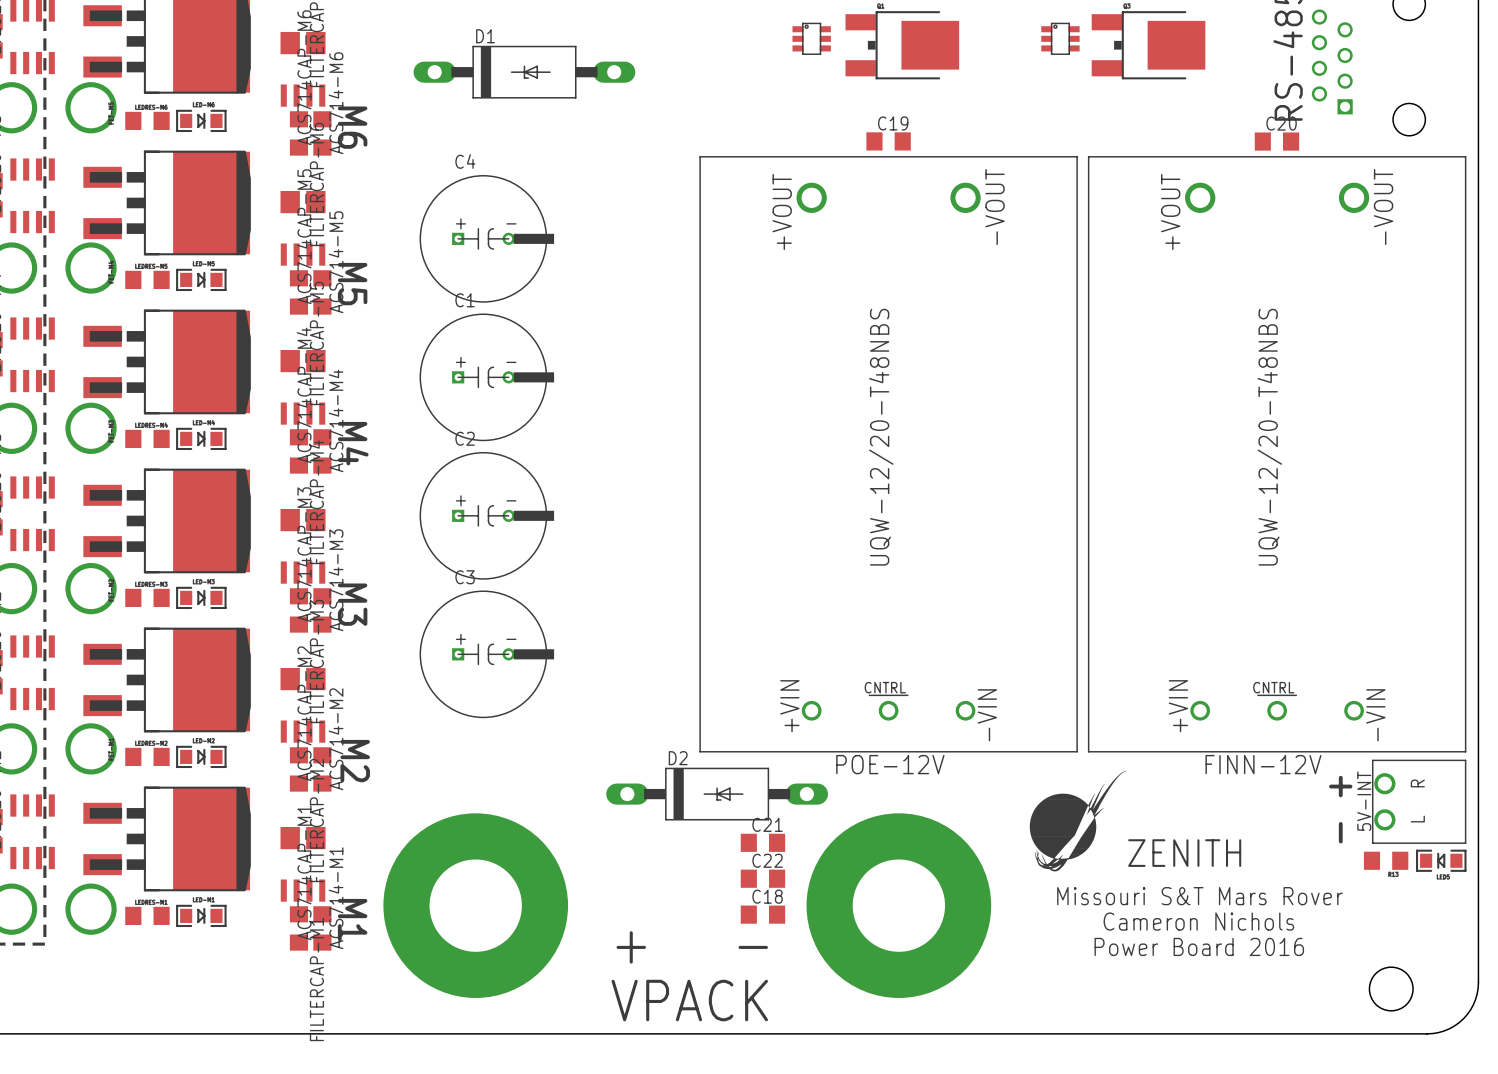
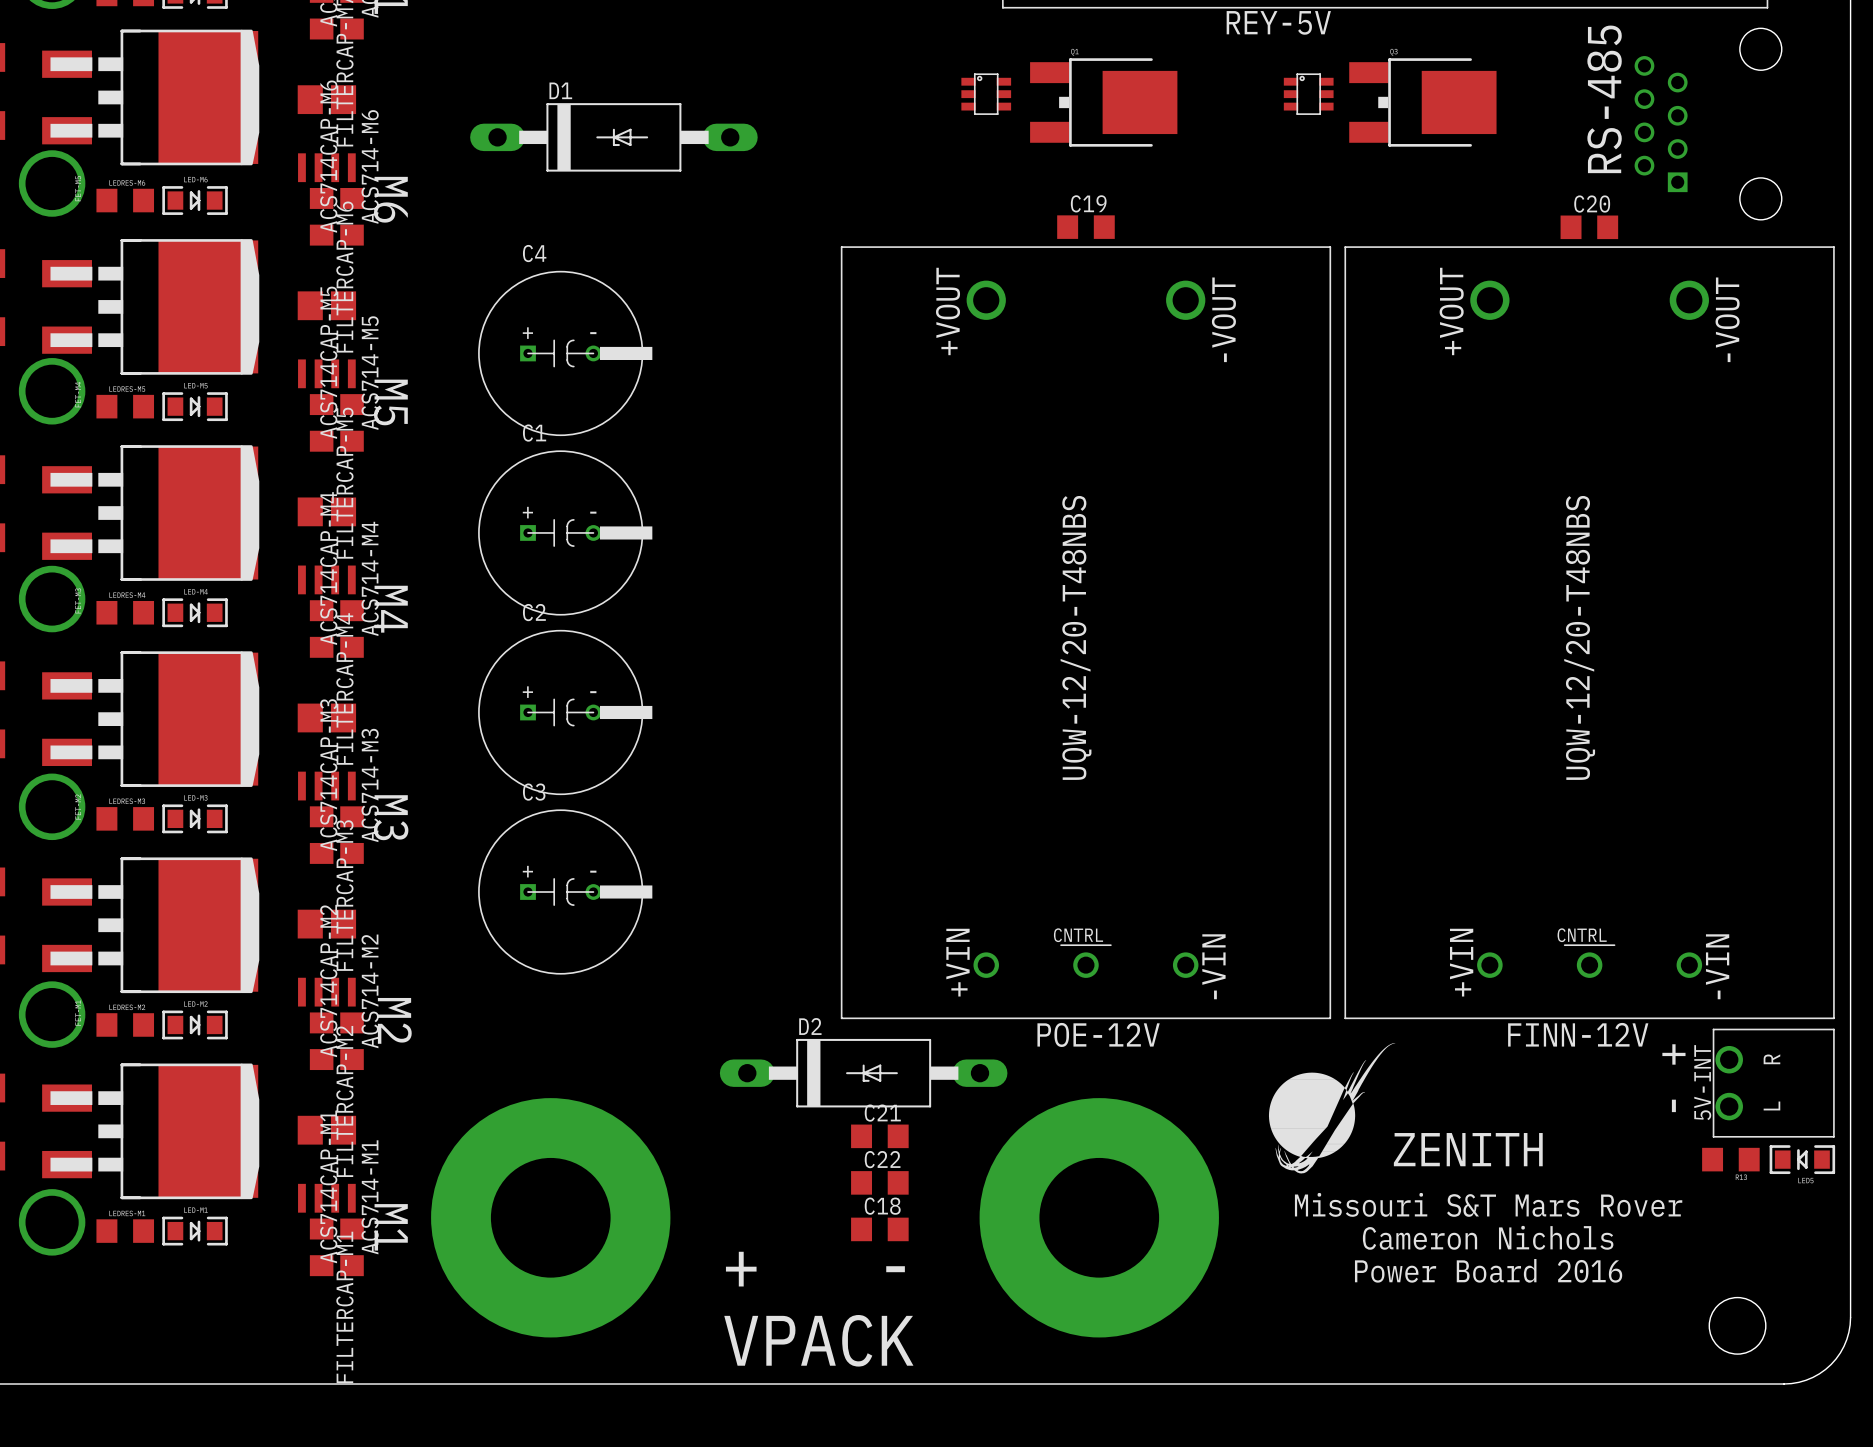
C21 position: (762, 842) -> (879, 1136)
C22 position: (762, 878) -> (879, 1182)
C18 position: (762, 914) -> (879, 1229)

